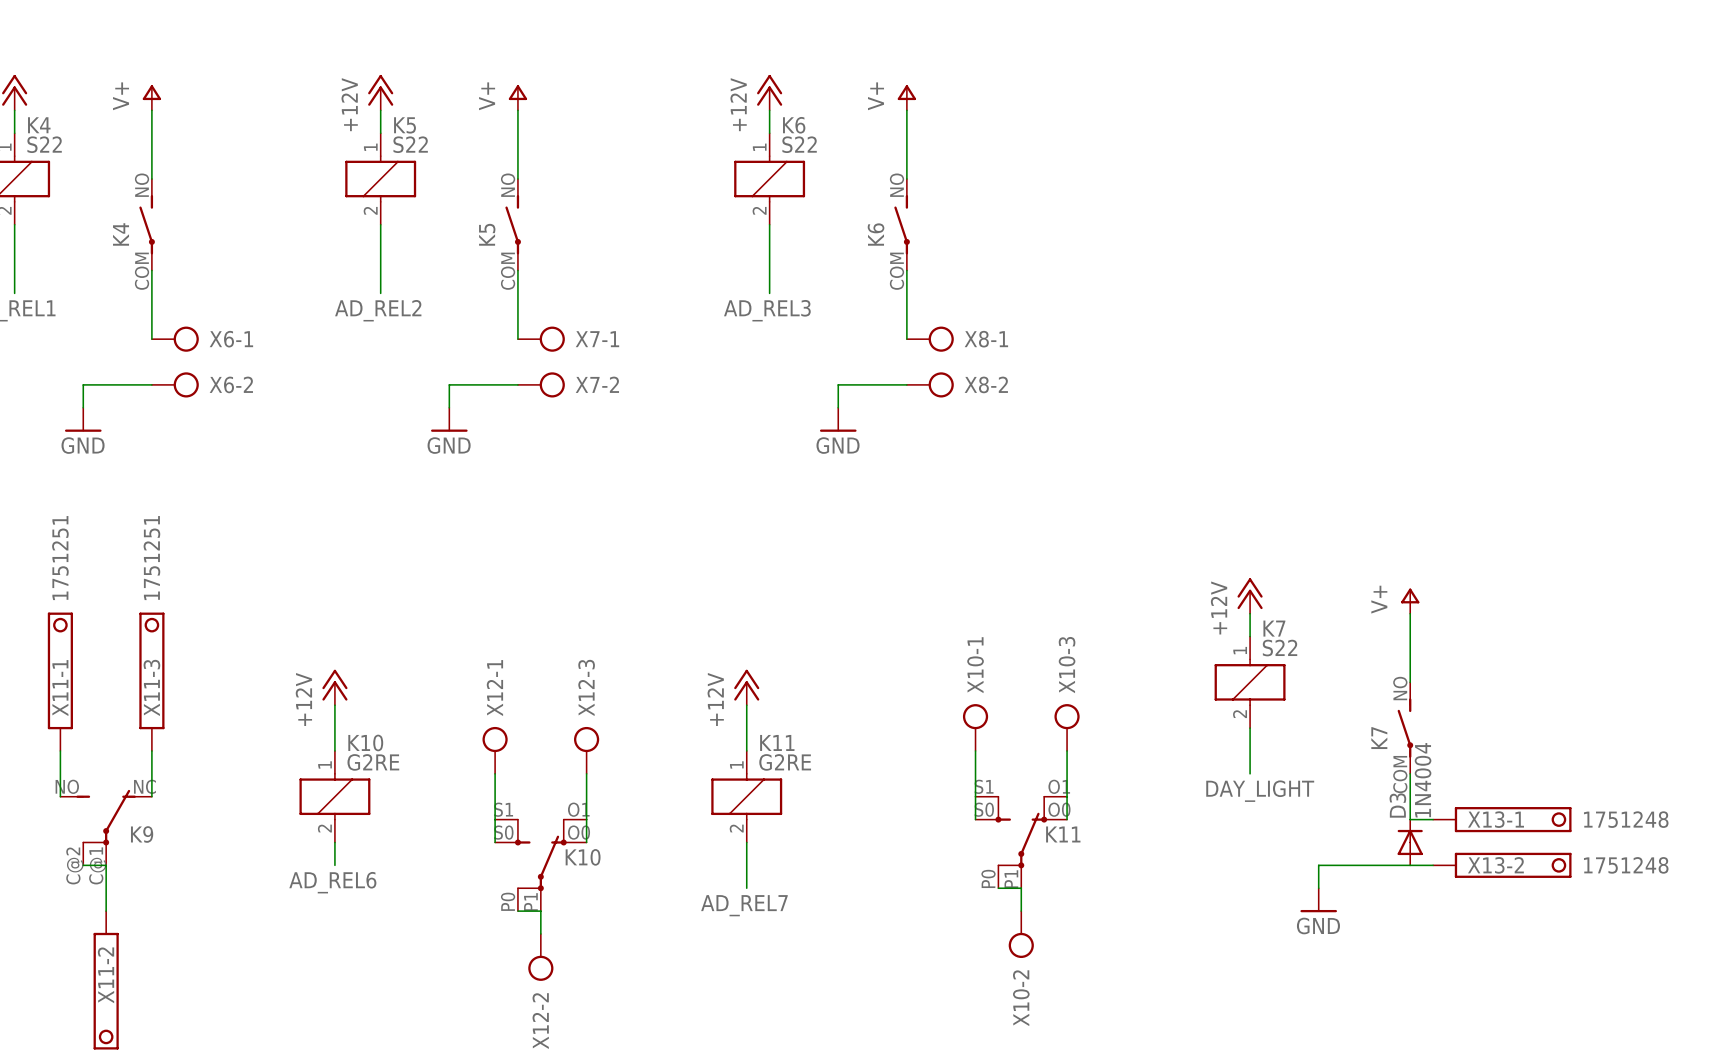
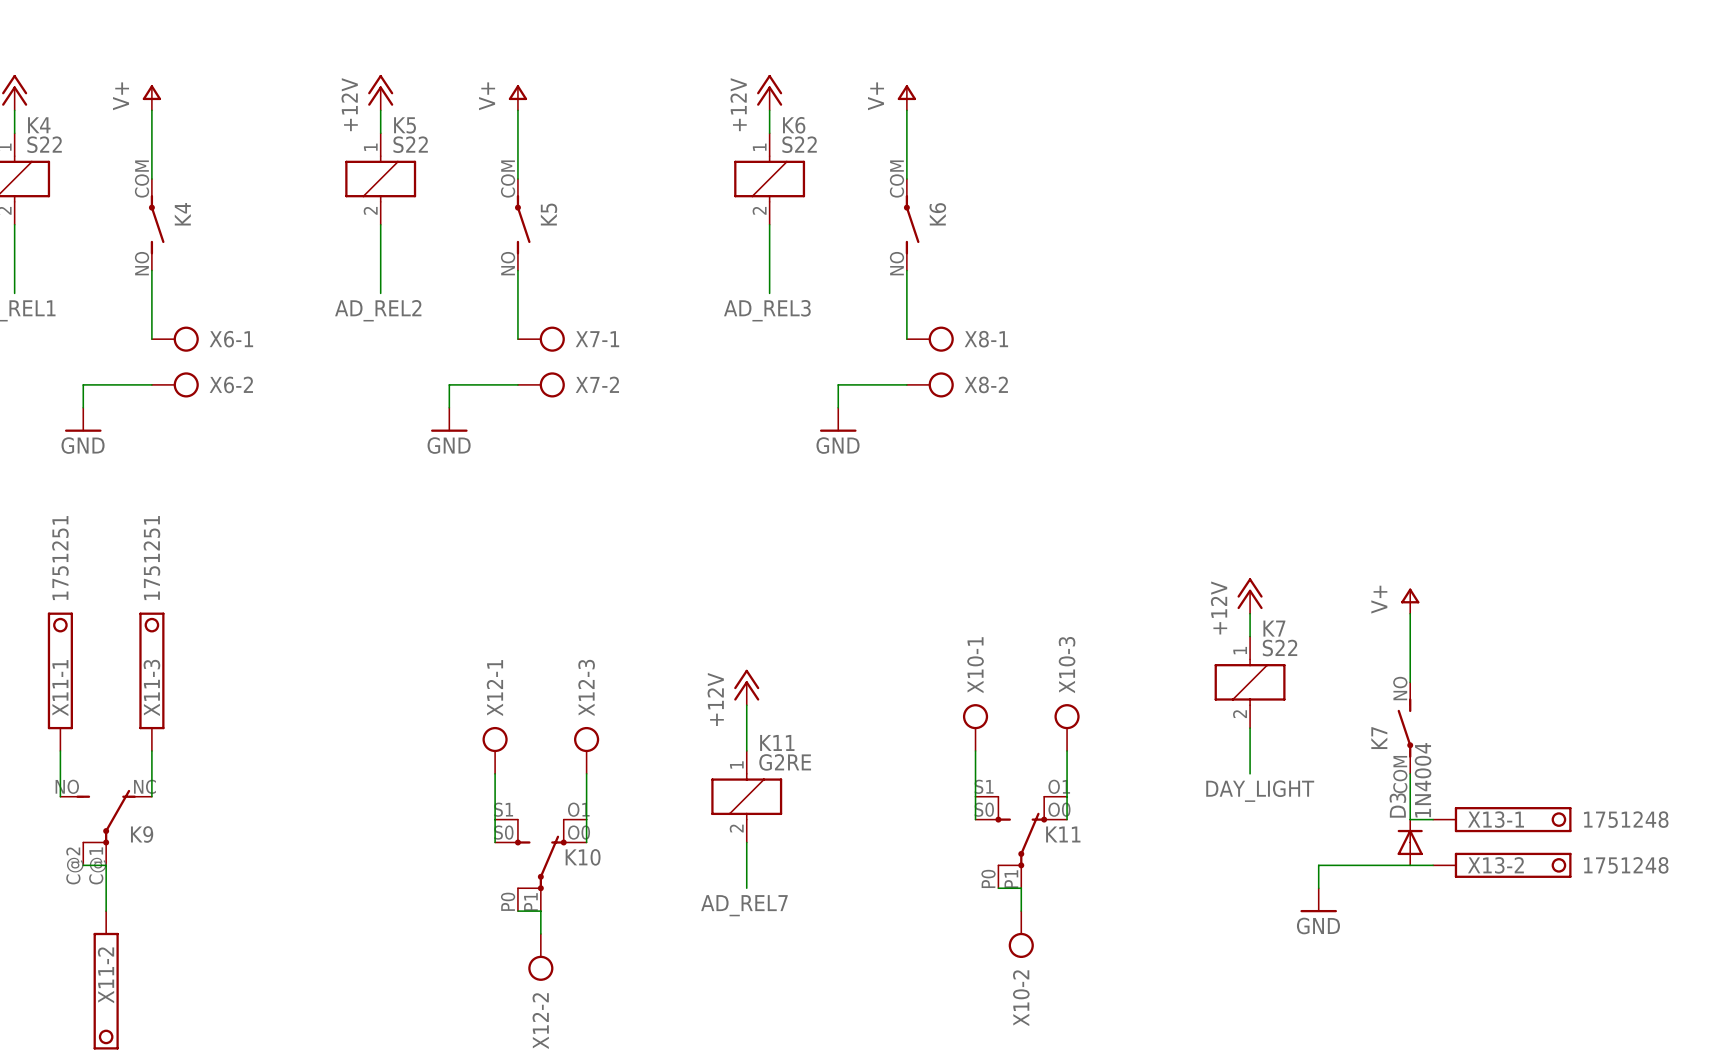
K4 rotation: 0° (147, 224) -> 180° (156, 224)
K5 rotation: 0° (513, 224) -> 180° (522, 224)
K6 rotation: 0° (902, 224) -> 180° (911, 224)
power symbol: +12V (334, 687) -> none
wire: (334, 705) (334, 750) -> none
K10: G2RE (334, 796) -> none
wire: (334, 842) (334, 865) -> none
label: AD_REL6 (332, 882) -> none

